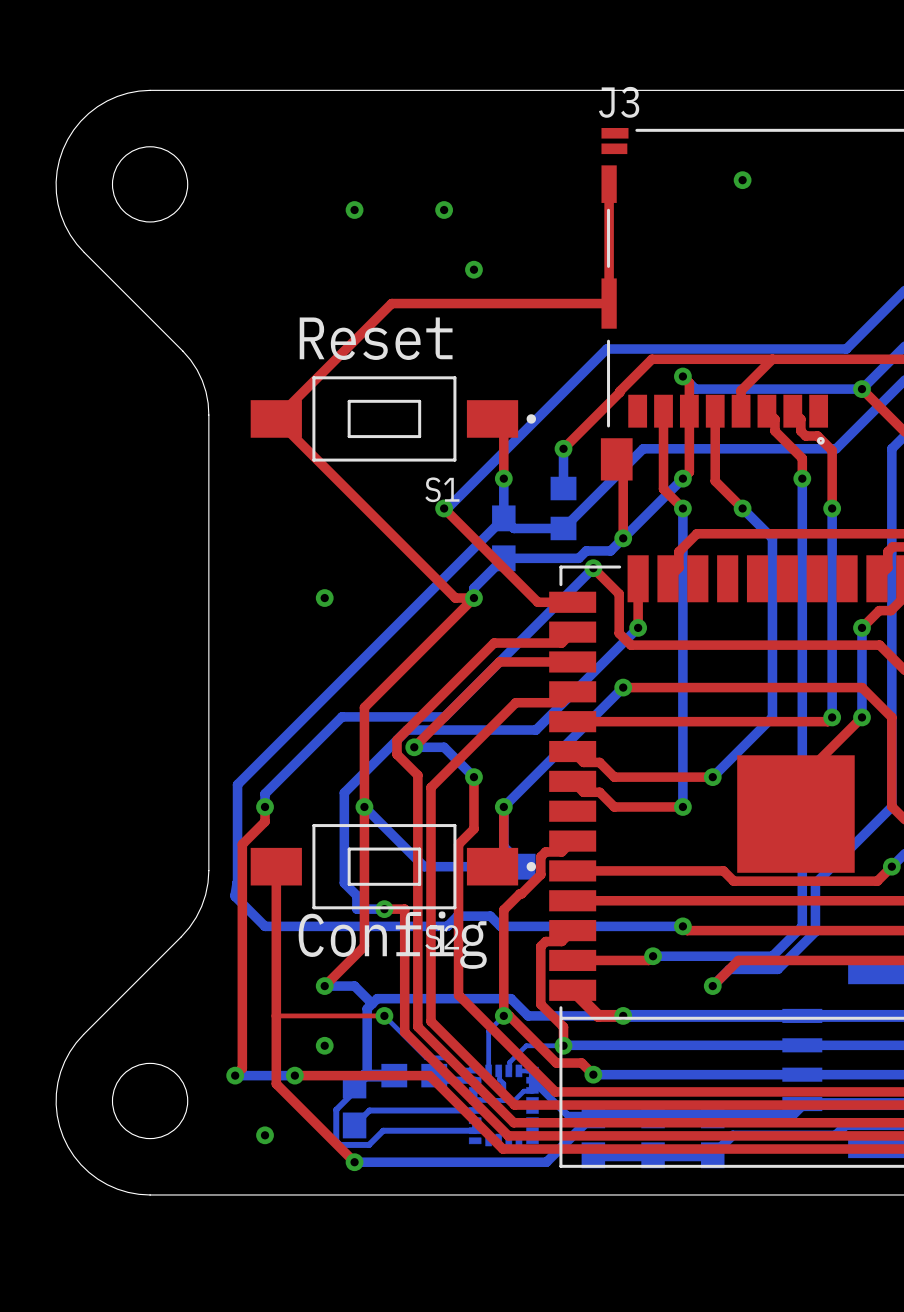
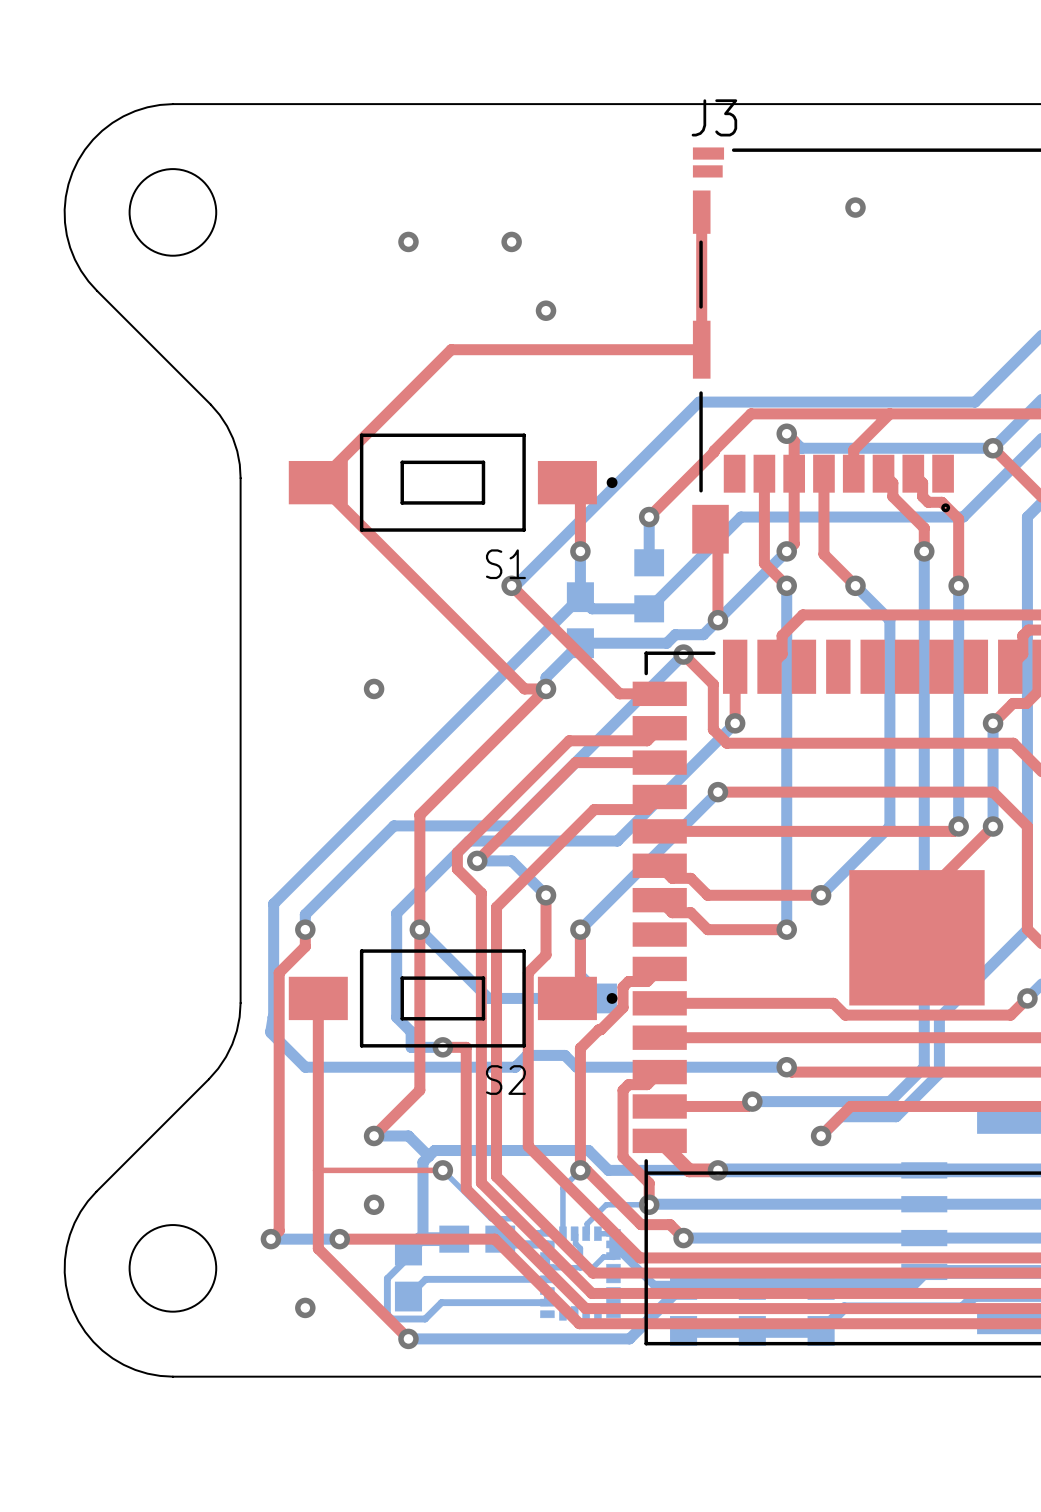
text: Reset (376, 338) -> none
text: Config (392, 940) -> none

